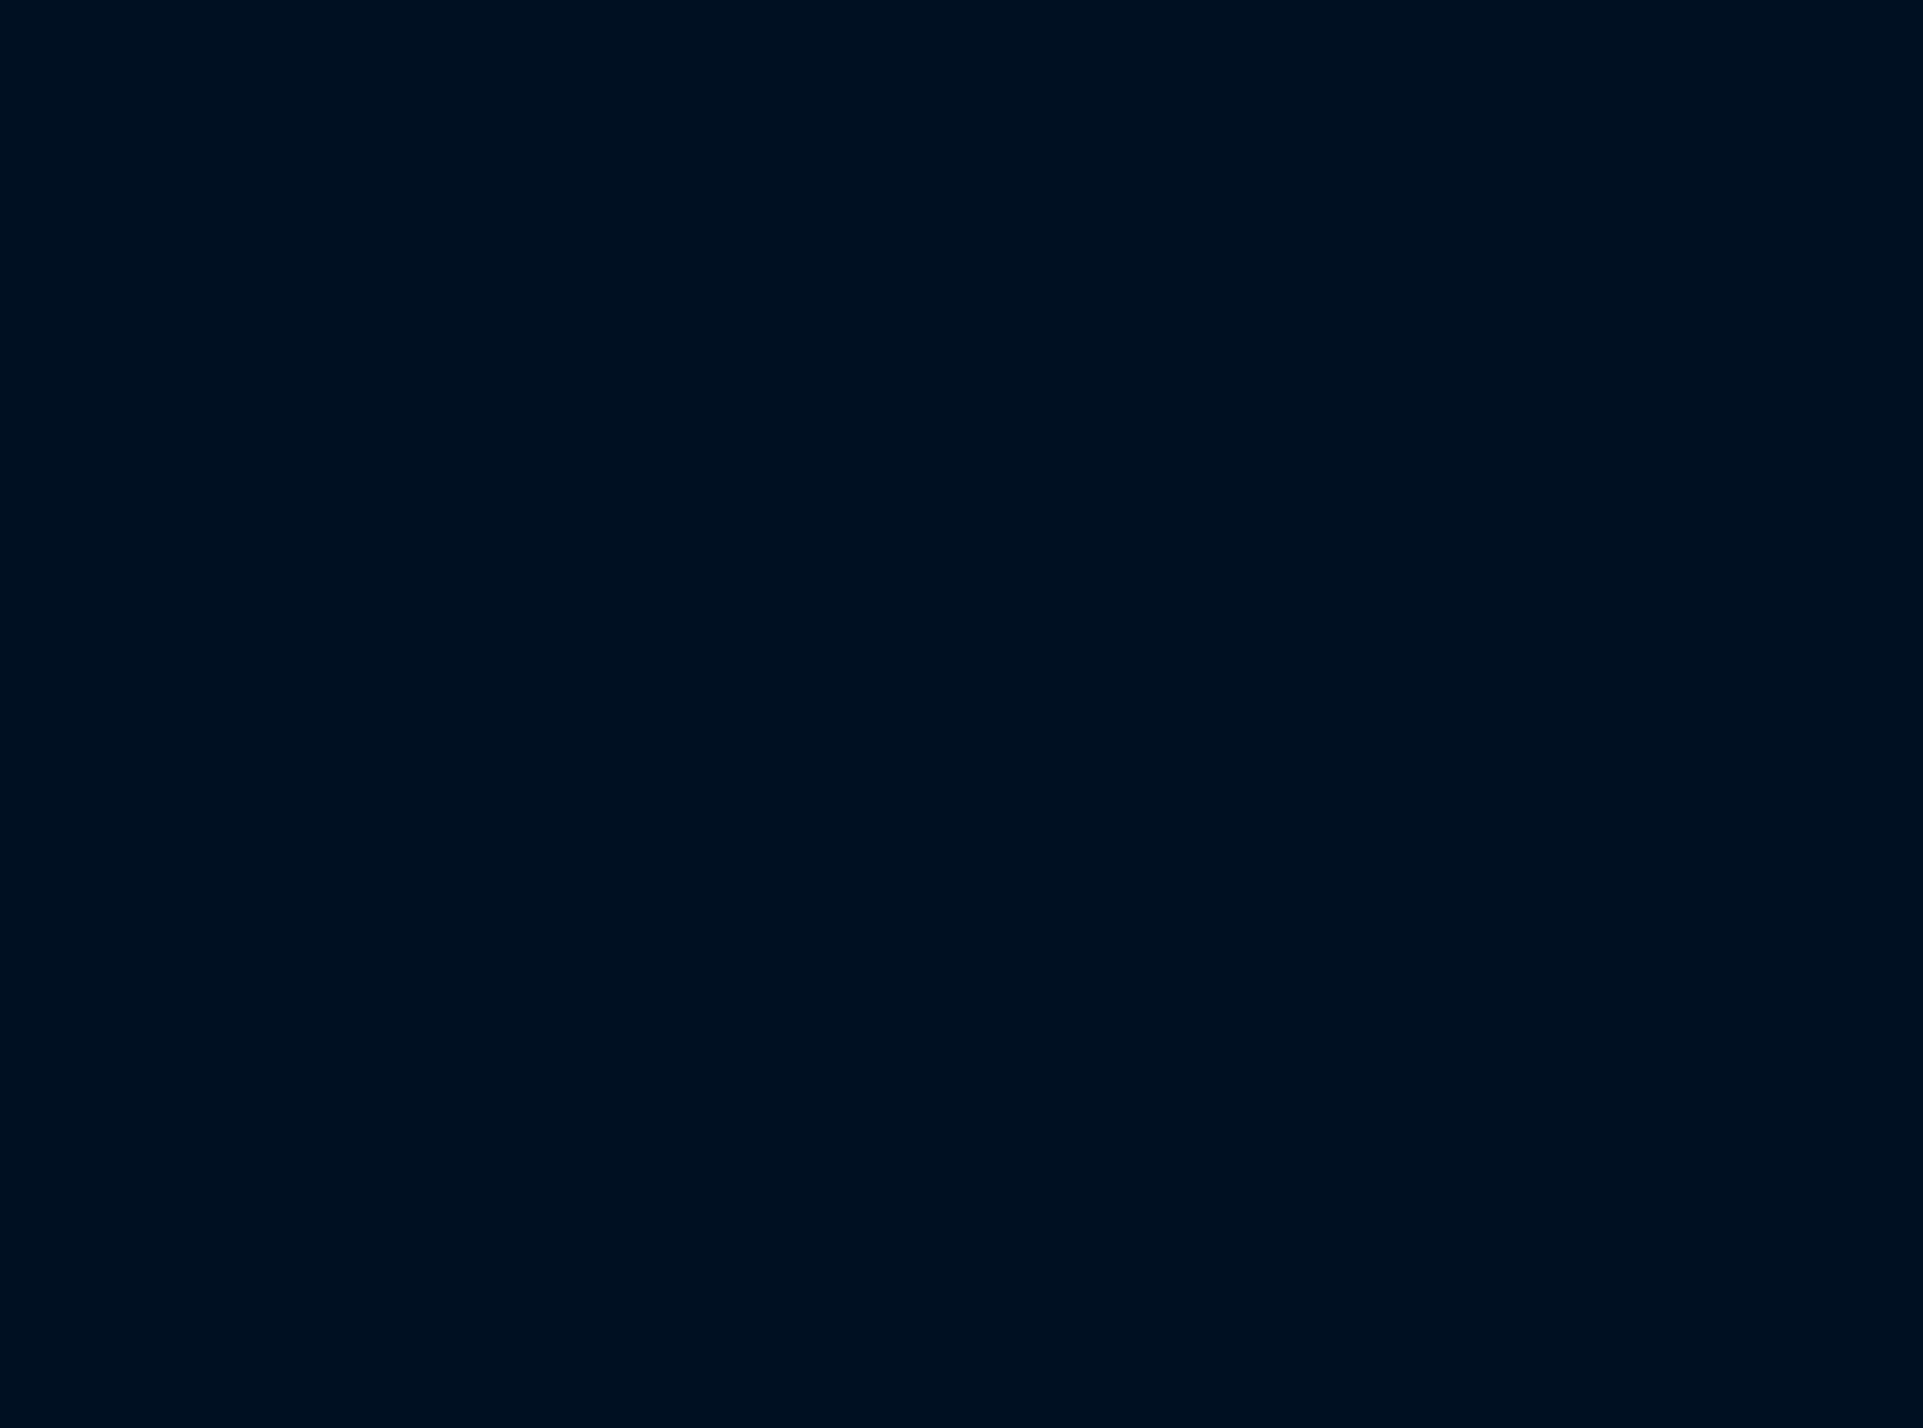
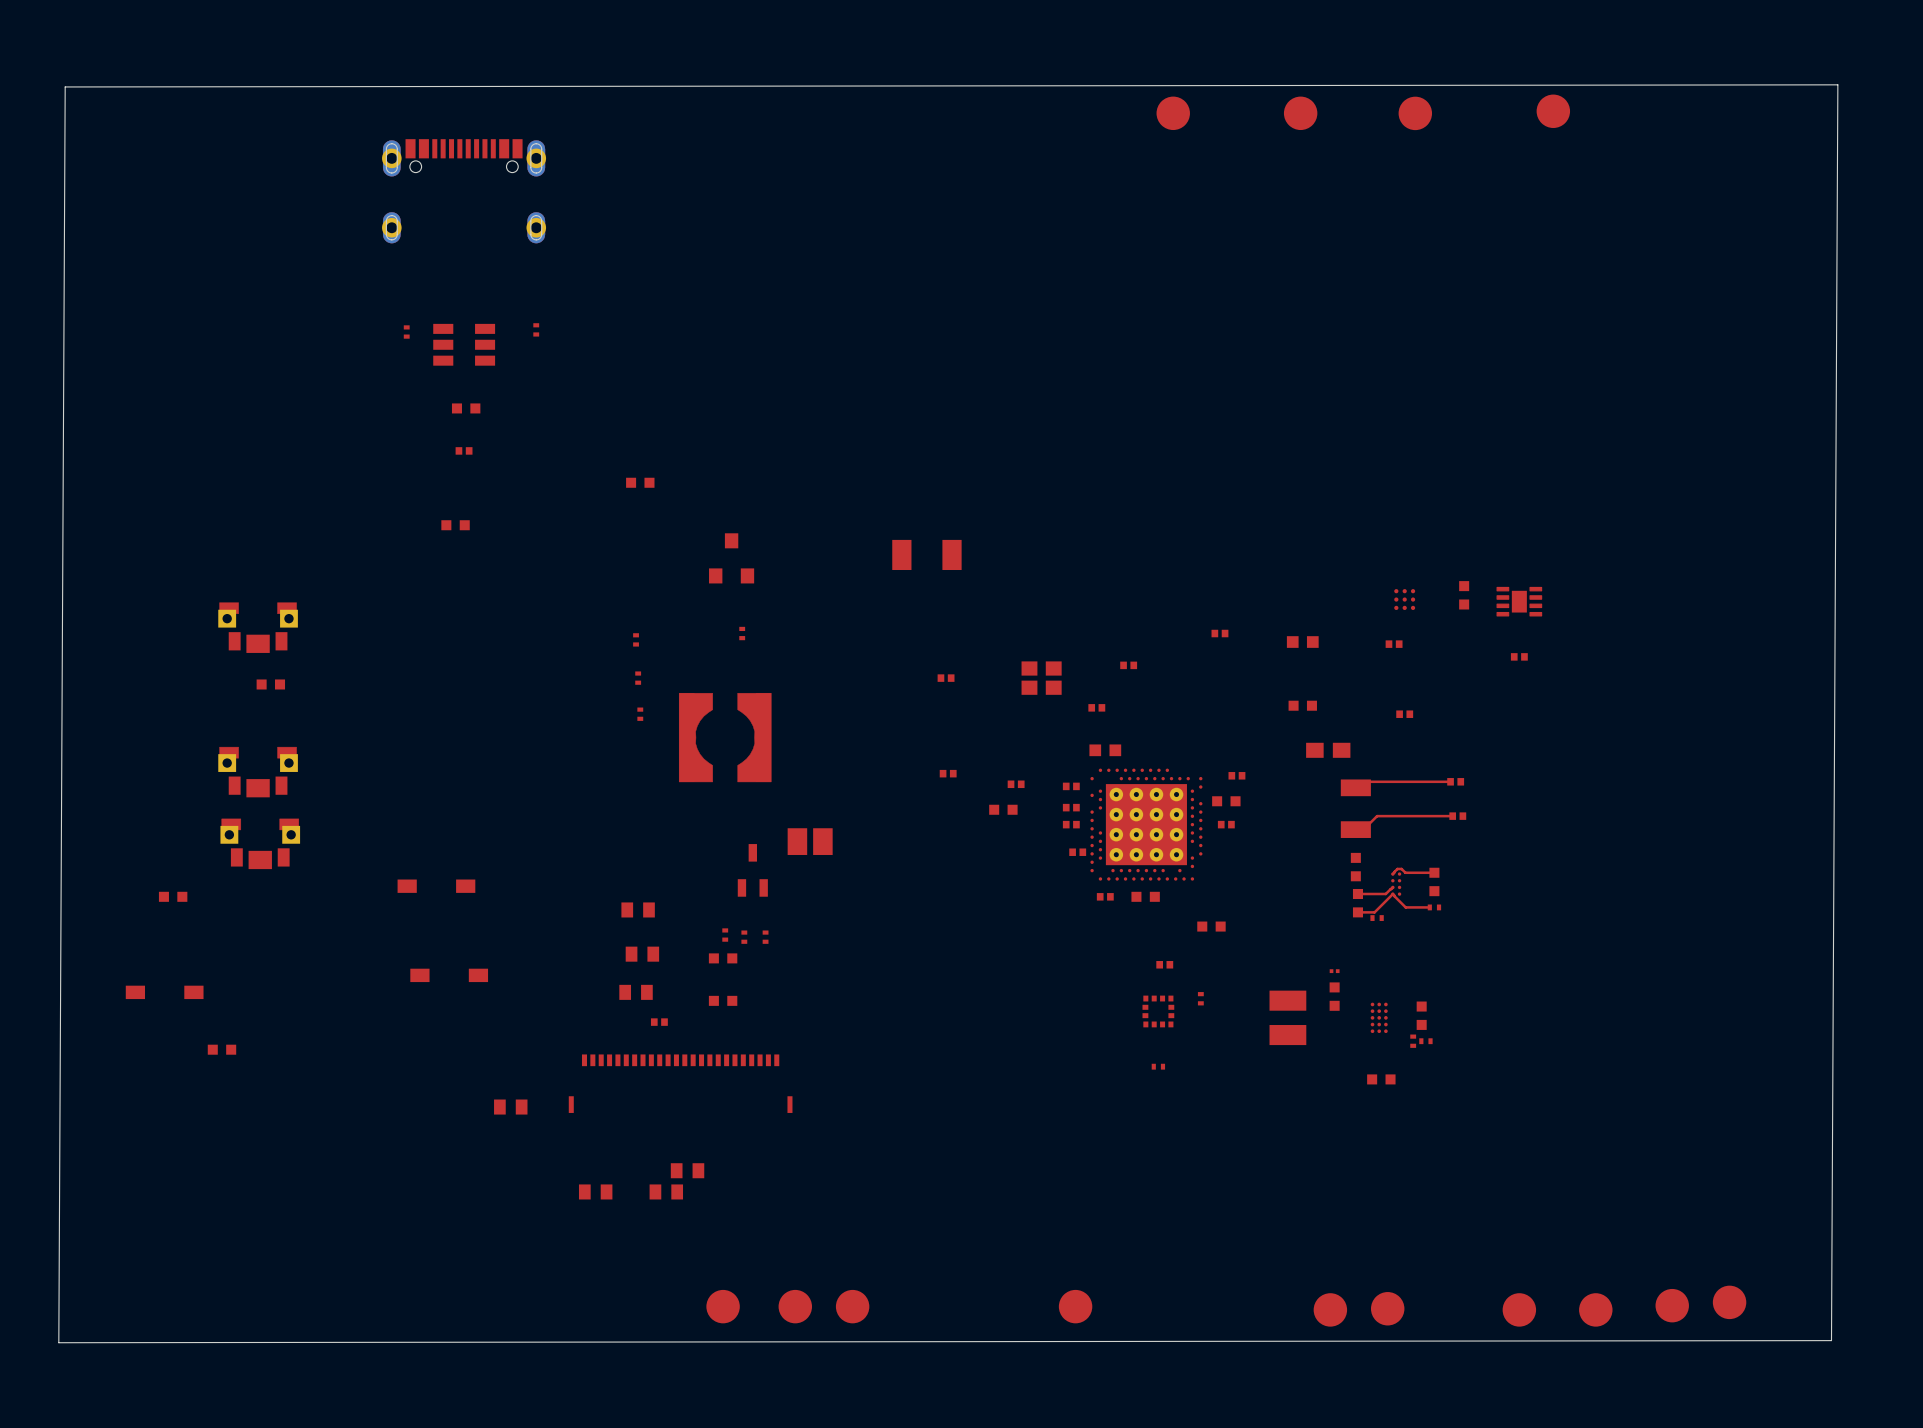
board edge: none -> (1837, 84) (65, 86) (58, 1342) (1831, 1340) (1837, 84)
part: none -> (1553, 111)
part: none -> (1173, 113)
part: none -> (1300, 113)
part: none -> (1415, 113)
part: none -> (464, 191)
part: none -> (536, 329)
part: none -> (406, 332)
part: none -> (464, 344)
part: none -> (466, 408)
part: none -> (464, 450)
part: none -> (640, 482)
part: none -> (455, 525)
part: none -> (926, 554)
part: none -> (731, 558)
part: none -> (1464, 595)
part: none -> (1404, 599)
part: none -> (1519, 601)
part: none -> (258, 627)
part: none -> (742, 633)
part: none -> (1219, 633)
part: none -> (636, 639)
part: none -> (1302, 642)
part: none -> (1394, 644)
part: none -> (1519, 656)
part: none -> (1128, 665)
part: none -> (638, 678)
part: none -> (946, 678)
part: none -> (1041, 678)
part: none -> (270, 684)
part: none -> (1302, 705)
part: none -> (1096, 707)
part: none -> (640, 714)
part: none -> (1404, 714)
part: none -> (725, 737)
part: none -> (1105, 750)
part: none -> (1328, 750)
part: none -> (258, 772)
part: none -> (948, 773)
part: none -> (1236, 775)
top track: none -> (1450, 781) (1361, 781) (1355, 787)
part: none -> (1455, 781)
part: none -> (1016, 784)
part: none -> (1071, 786)
part: none -> (1226, 801)
part: none -> (1071, 807)
part: none -> (1355, 808)
part: none -> (1003, 809)
top track: none -> (1452, 816) (1377, 816) (1363, 829) (1355, 829)
part: none -> (1457, 816)
part: none -> (1071, 824)
part: none -> (1146, 824)
part: none -> (1226, 824)
part: none -> (810, 841)
part: none -> (260, 843)
part: none -> (1077, 852)
part: none -> (1355, 867)
part: none -> (752, 870)
top track: none -> (1434, 872) (1405, 872) (1401, 868) (1397, 868) (1392, 874)
part: none -> (1434, 881)
part: none -> (1396, 884)
part: none -> (436, 886)
top track: none -> (1392, 887) (1385, 893) (1357, 893)
part: none -> (173, 896)
part: none -> (1105, 896)
part: none -> (1145, 896)
part: none -> (1357, 903)
top track: none -> (1429, 907) (1405, 907) (1392, 894) (1374, 912) (1357, 912)
part: none -> (1434, 907)
part: none -> (638, 909)
part: none -> (1377, 918)
part: none -> (1211, 926)
part: none -> (725, 935)
part: none -> (744, 937)
part: none -> (765, 937)
part: none -> (642, 954)
part: none -> (723, 958)
part: none -> (1164, 964)
part: none -> (1334, 971)
part: none -> (449, 975)
part: none -> (164, 992)
part: none -> (636, 992)
part: none -> (1334, 996)
part: none -> (1200, 998)
part: none -> (723, 1000)
part: none -> (1158, 1011)
part: none -> (1421, 1015)
part: none -> (1287, 1017)
part: none -> (1379, 1017)
part: none -> (659, 1022)
part: none -> (1413, 1041)
part: none -> (1425, 1041)
part: none -> (221, 1049)
part: none -> (1158, 1066)
part: none -> (1381, 1079)
part: none -> (680, 1083)
part: none -> (510, 1107)
part: none -> (687, 1170)
part: none -> (595, 1191)
part: none -> (666, 1191)
part: none -> (1729, 1302)
part: none -> (1672, 1305)
part: none -> (723, 1306)
part: none -> (795, 1306)
part: none -> (852, 1306)
part: none -> (1075, 1306)
part: none -> (1387, 1308)
part: none -> (1330, 1309)
part: none -> (1519, 1309)
part: none -> (1595, 1309)

